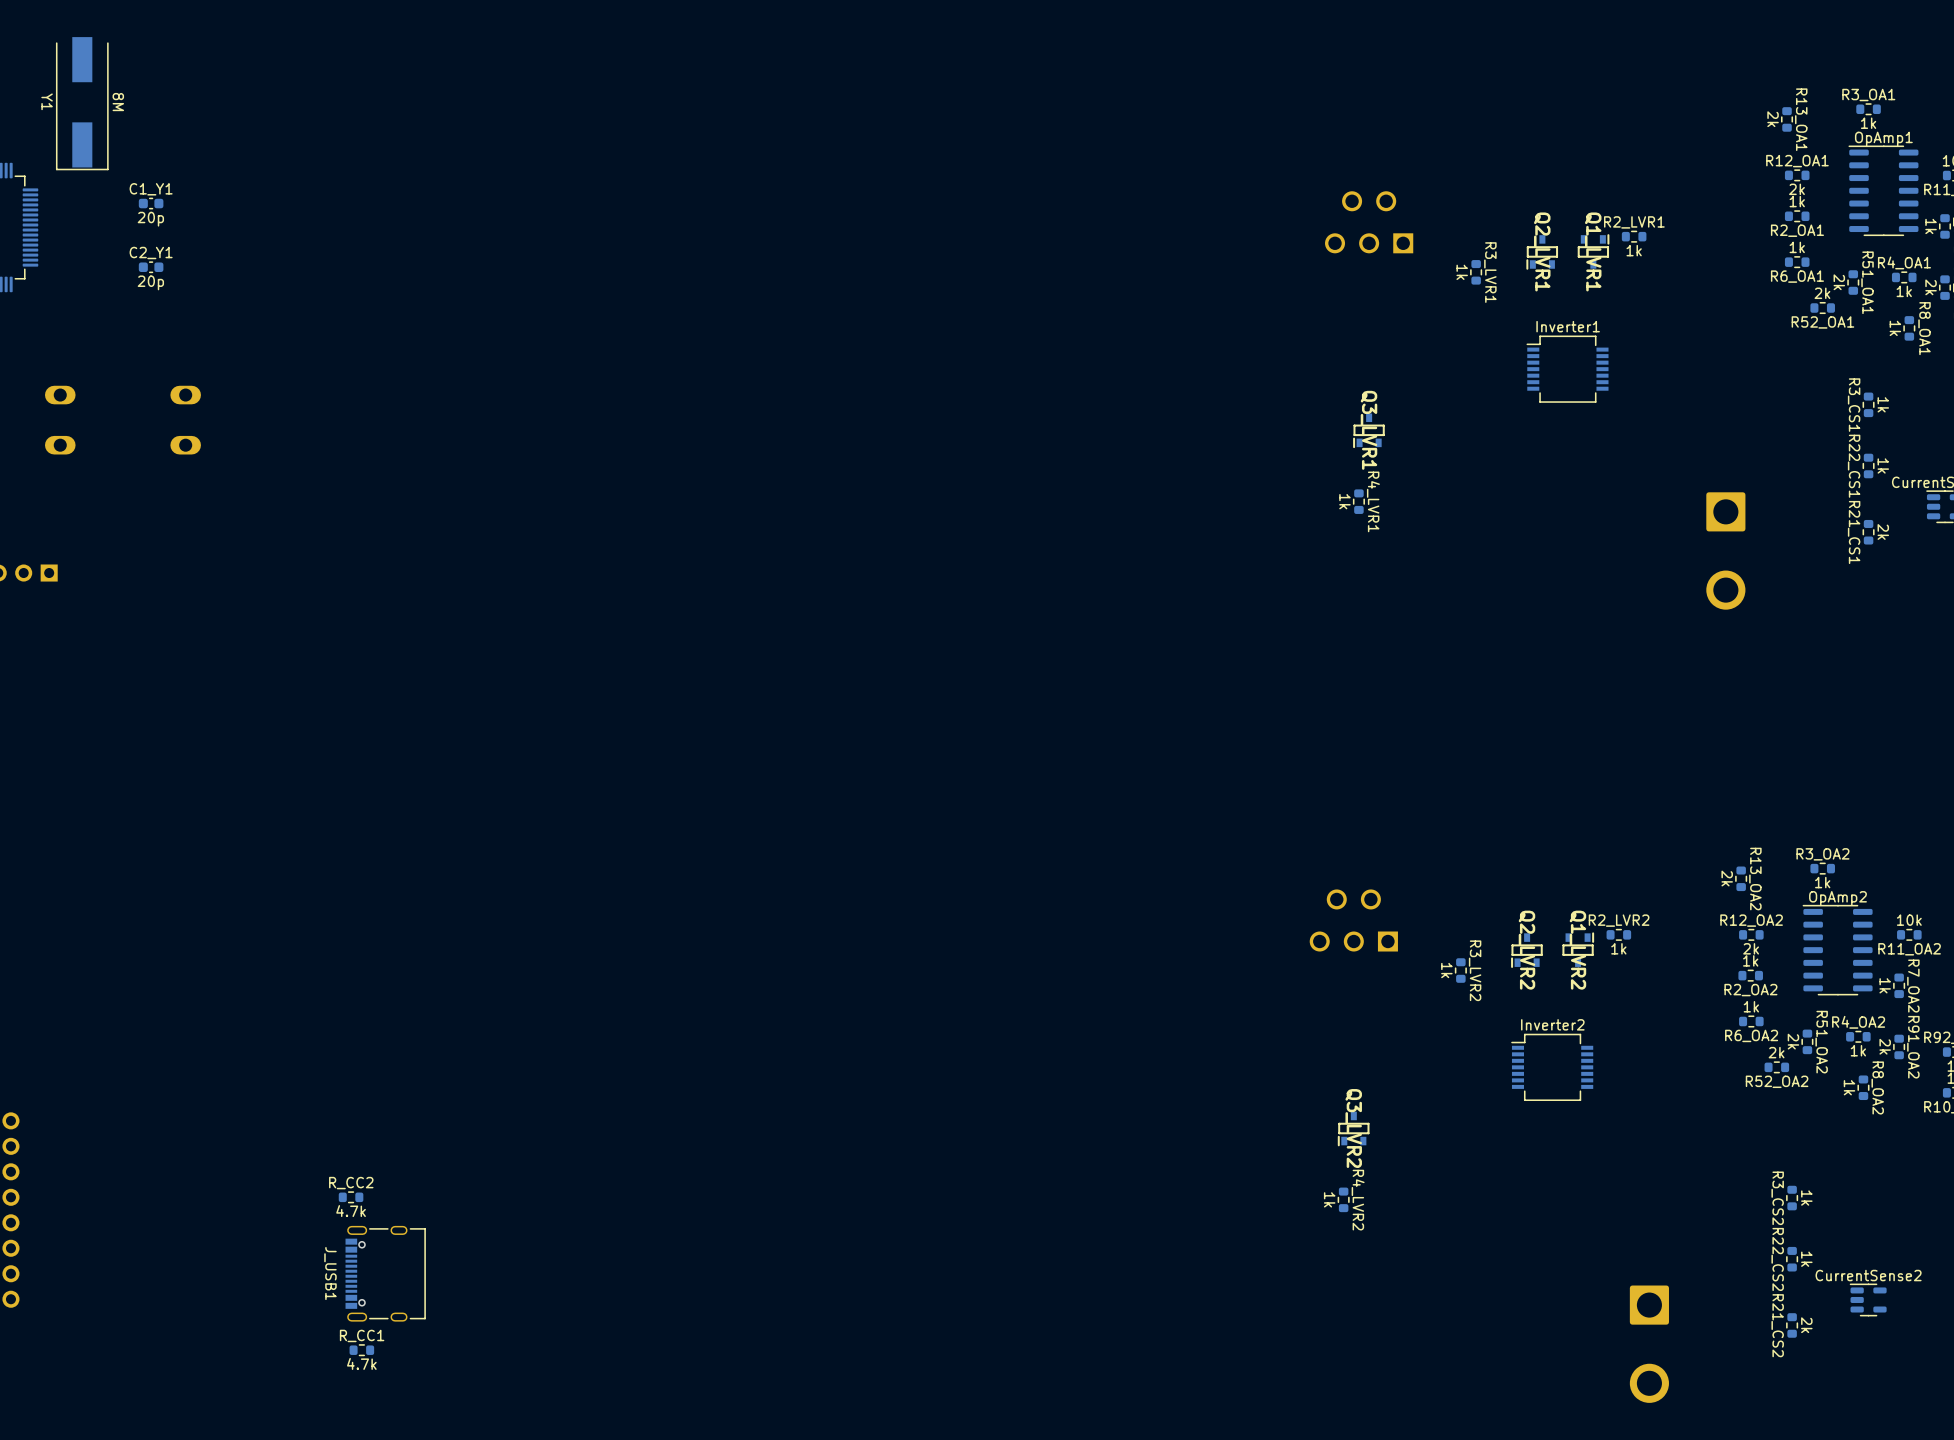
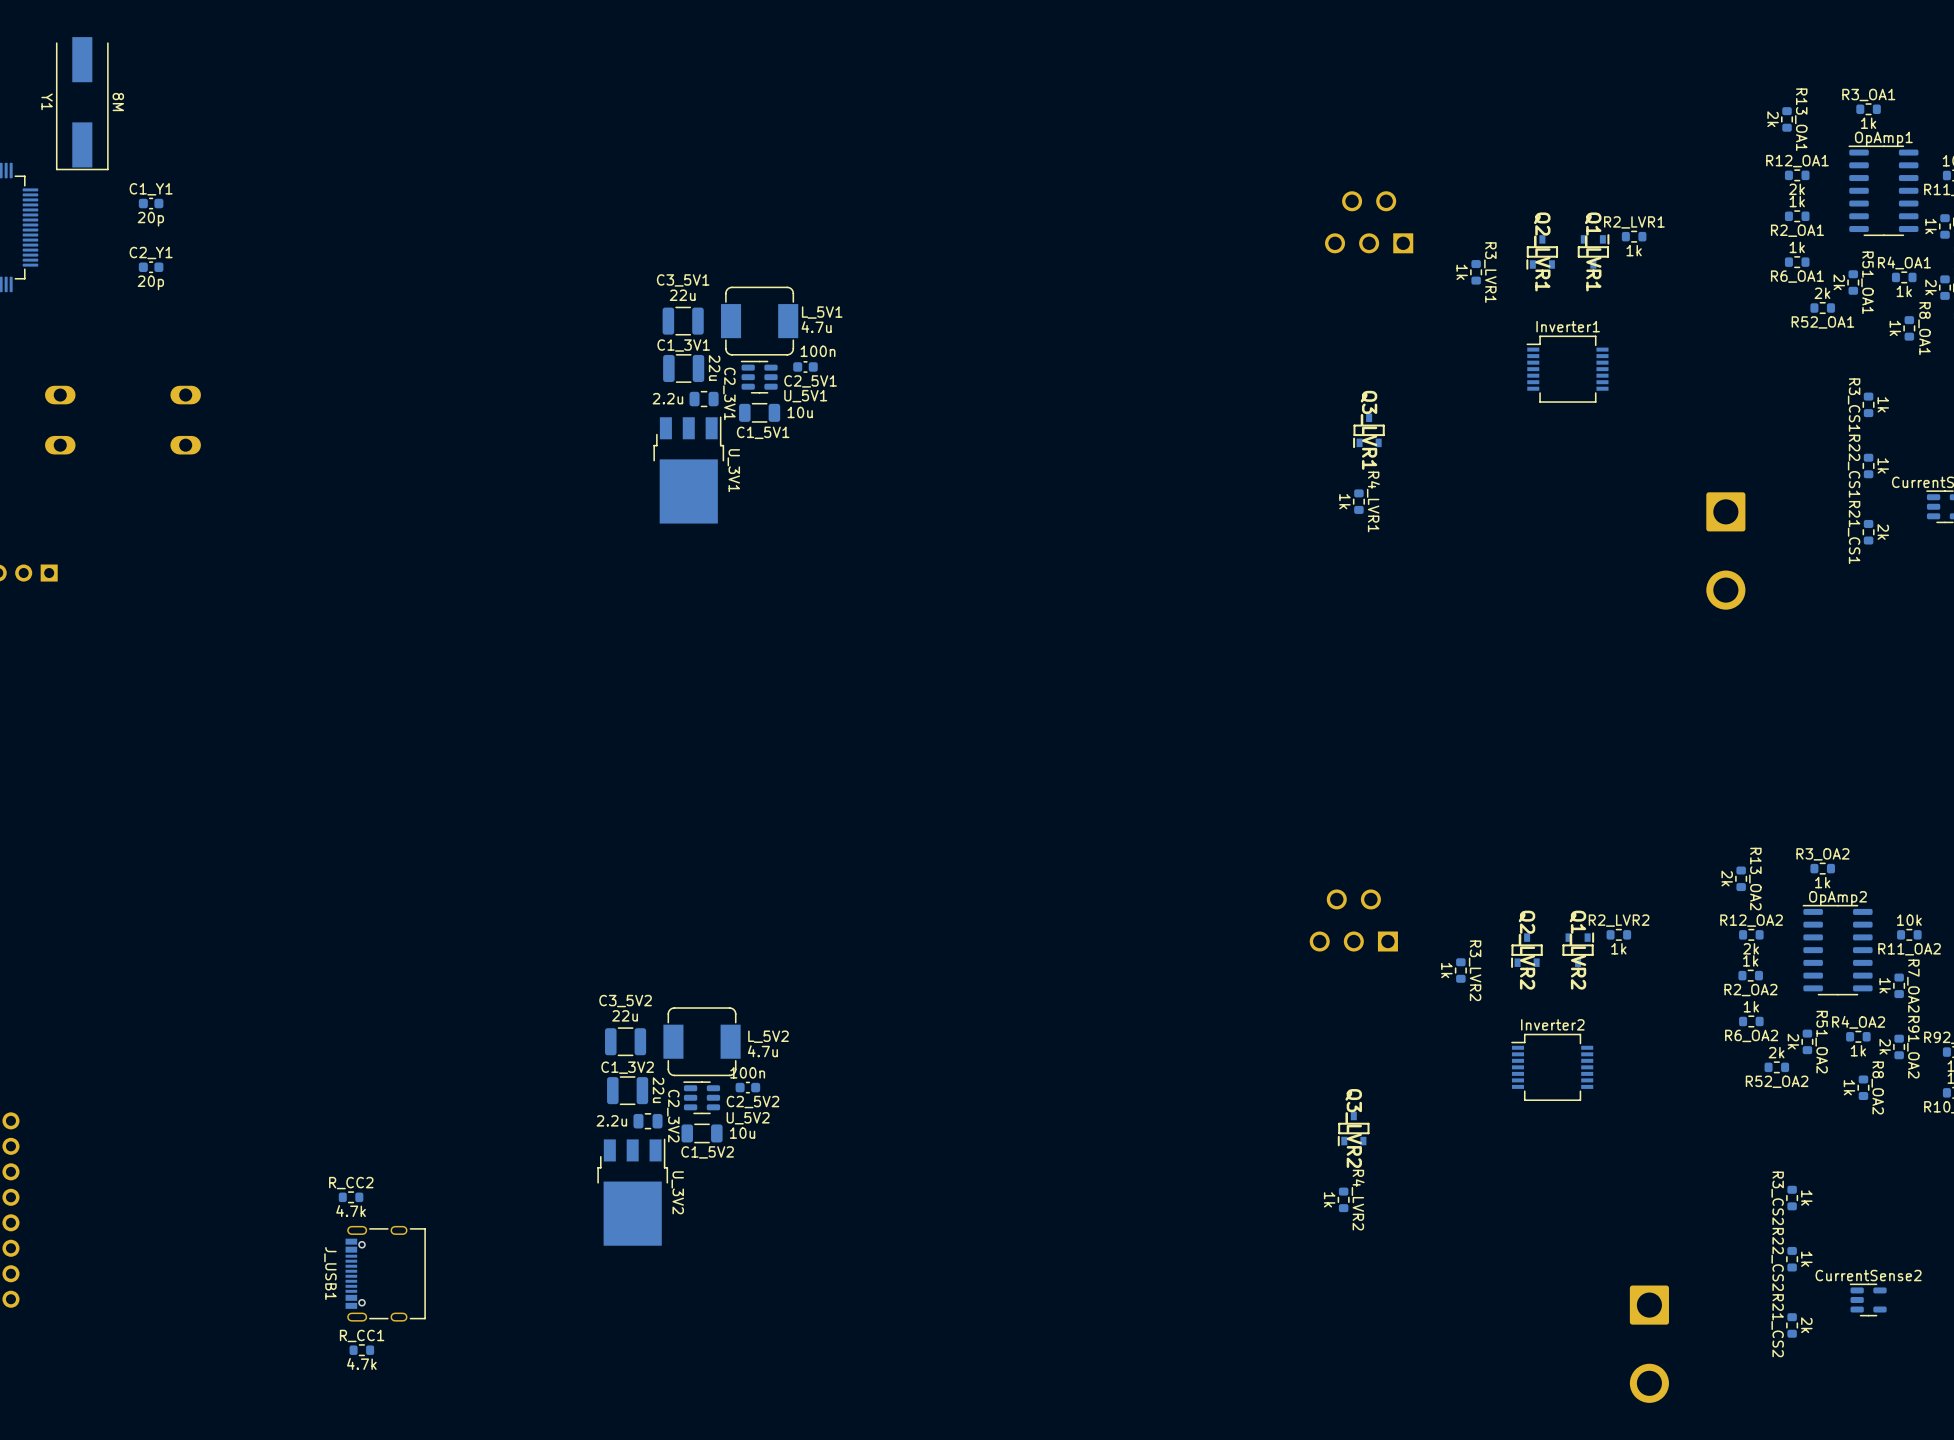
C3_5V1: none -> 22u (683, 321)
L_5V1: none -> 4.7u (759, 321)
C2_5V1: none -> 100n (805, 366)
C1_3V1: none -> 22u (683, 368)
U_5V1: none -> (759, 377)
C2_3V1: none -> 2.2u (704, 399)
C1_5V1: none -> 10u (759, 412)
U_3V1: none -> (688, 470)
C3_5V2: none -> 22u (625, 1041)
L_5V2: none -> 4.7u (702, 1041)
C2_5V2: none -> 100n (747, 1087)
C1_3V2: none -> 22u (627, 1090)
U_5V2: none -> (701, 1097)
C2_3V2: none -> 2.2u (648, 1121)
C1_5V2: none -> 10u (702, 1133)
U_3V2: none -> (632, 1192)

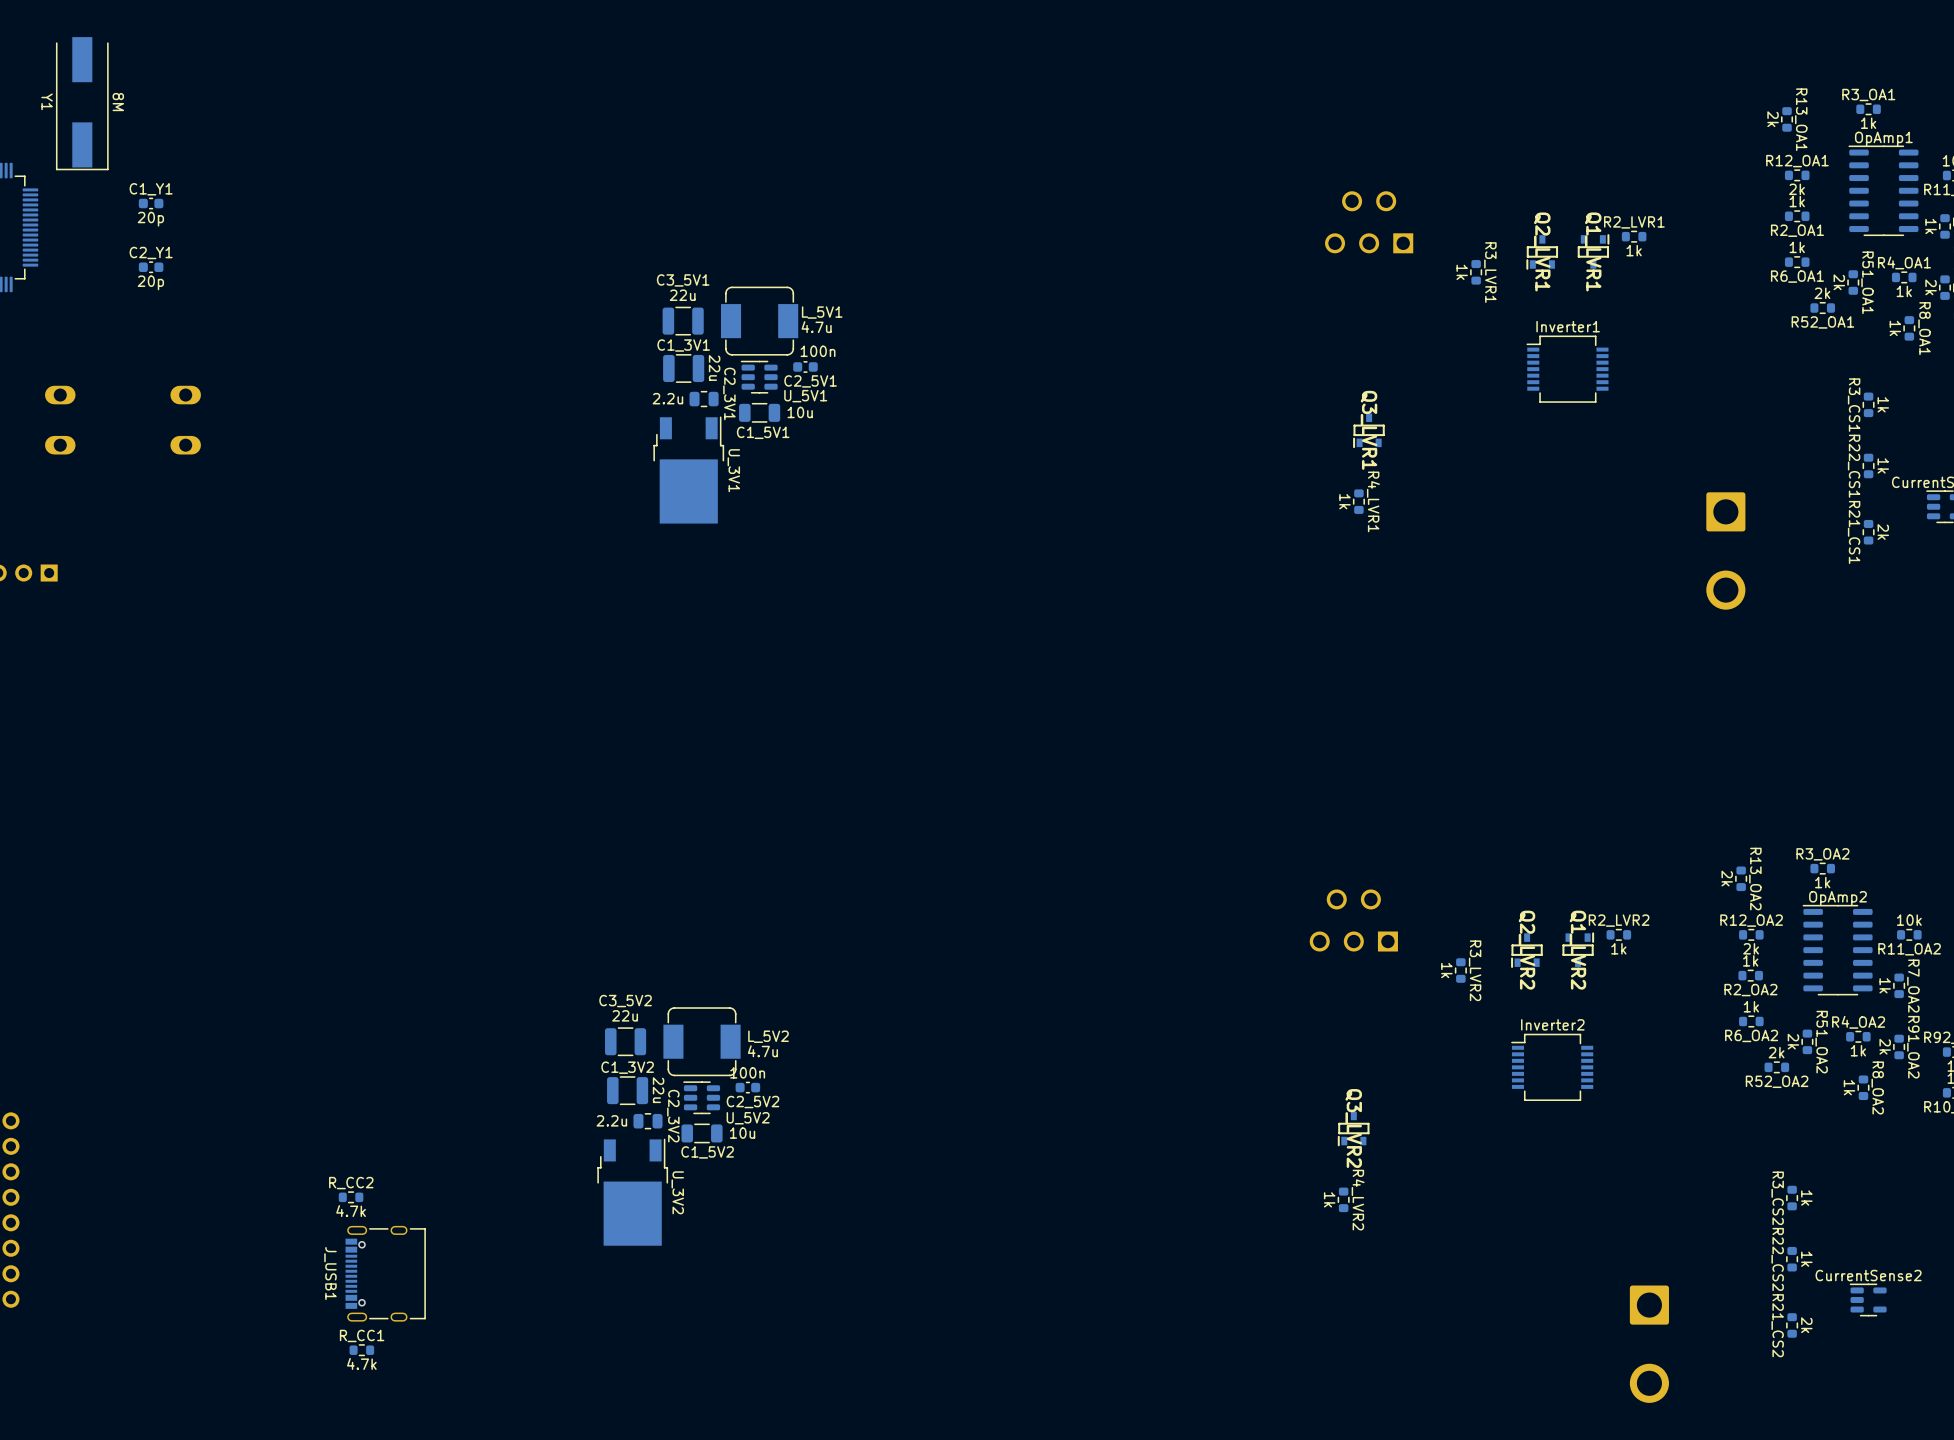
U_3V1 footprint: [653, 416, 724, 524] -> [653, 416, 724, 524]
U_3V2 footprint: [597, 1138, 668, 1246] -> [597, 1138, 668, 1246]

